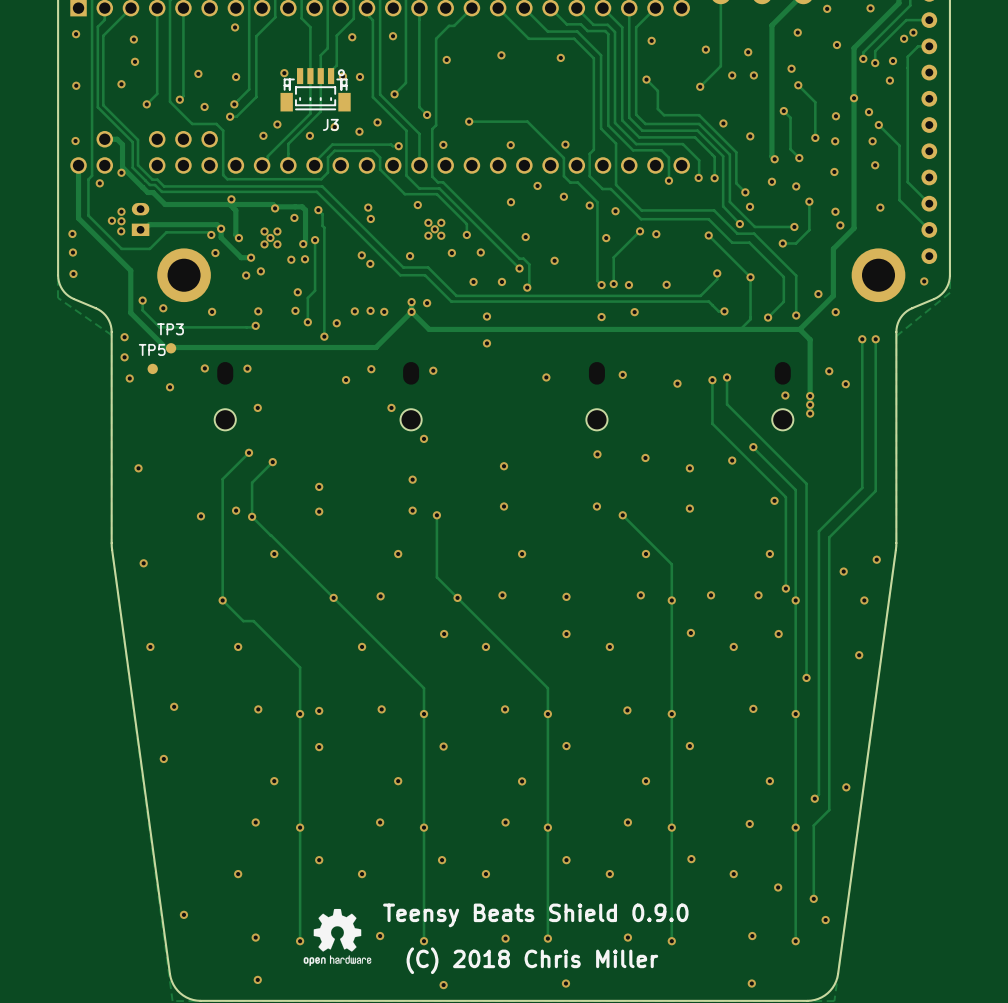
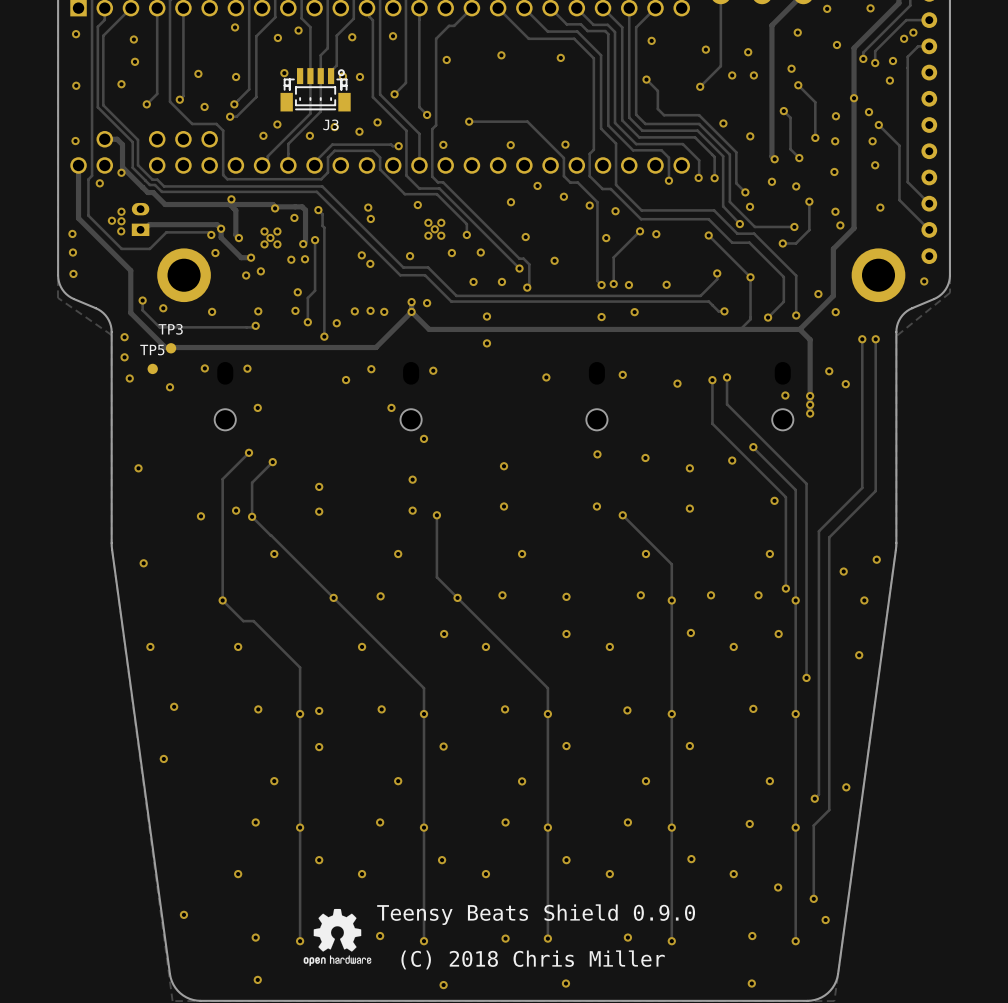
via: none -> (298, 30)
via: none -> (277, 37)

